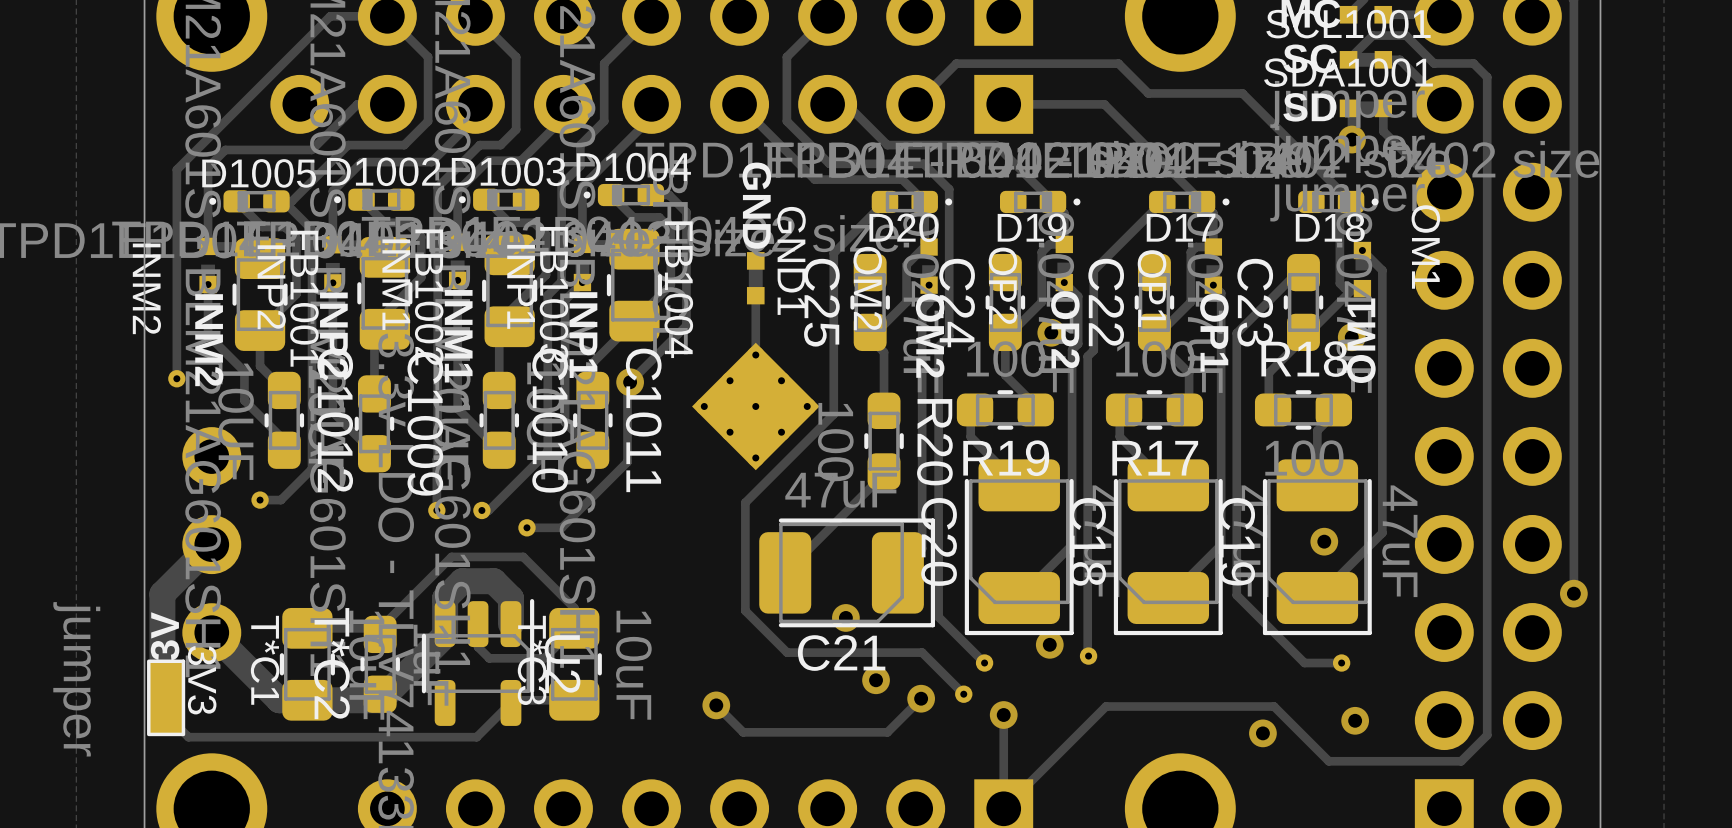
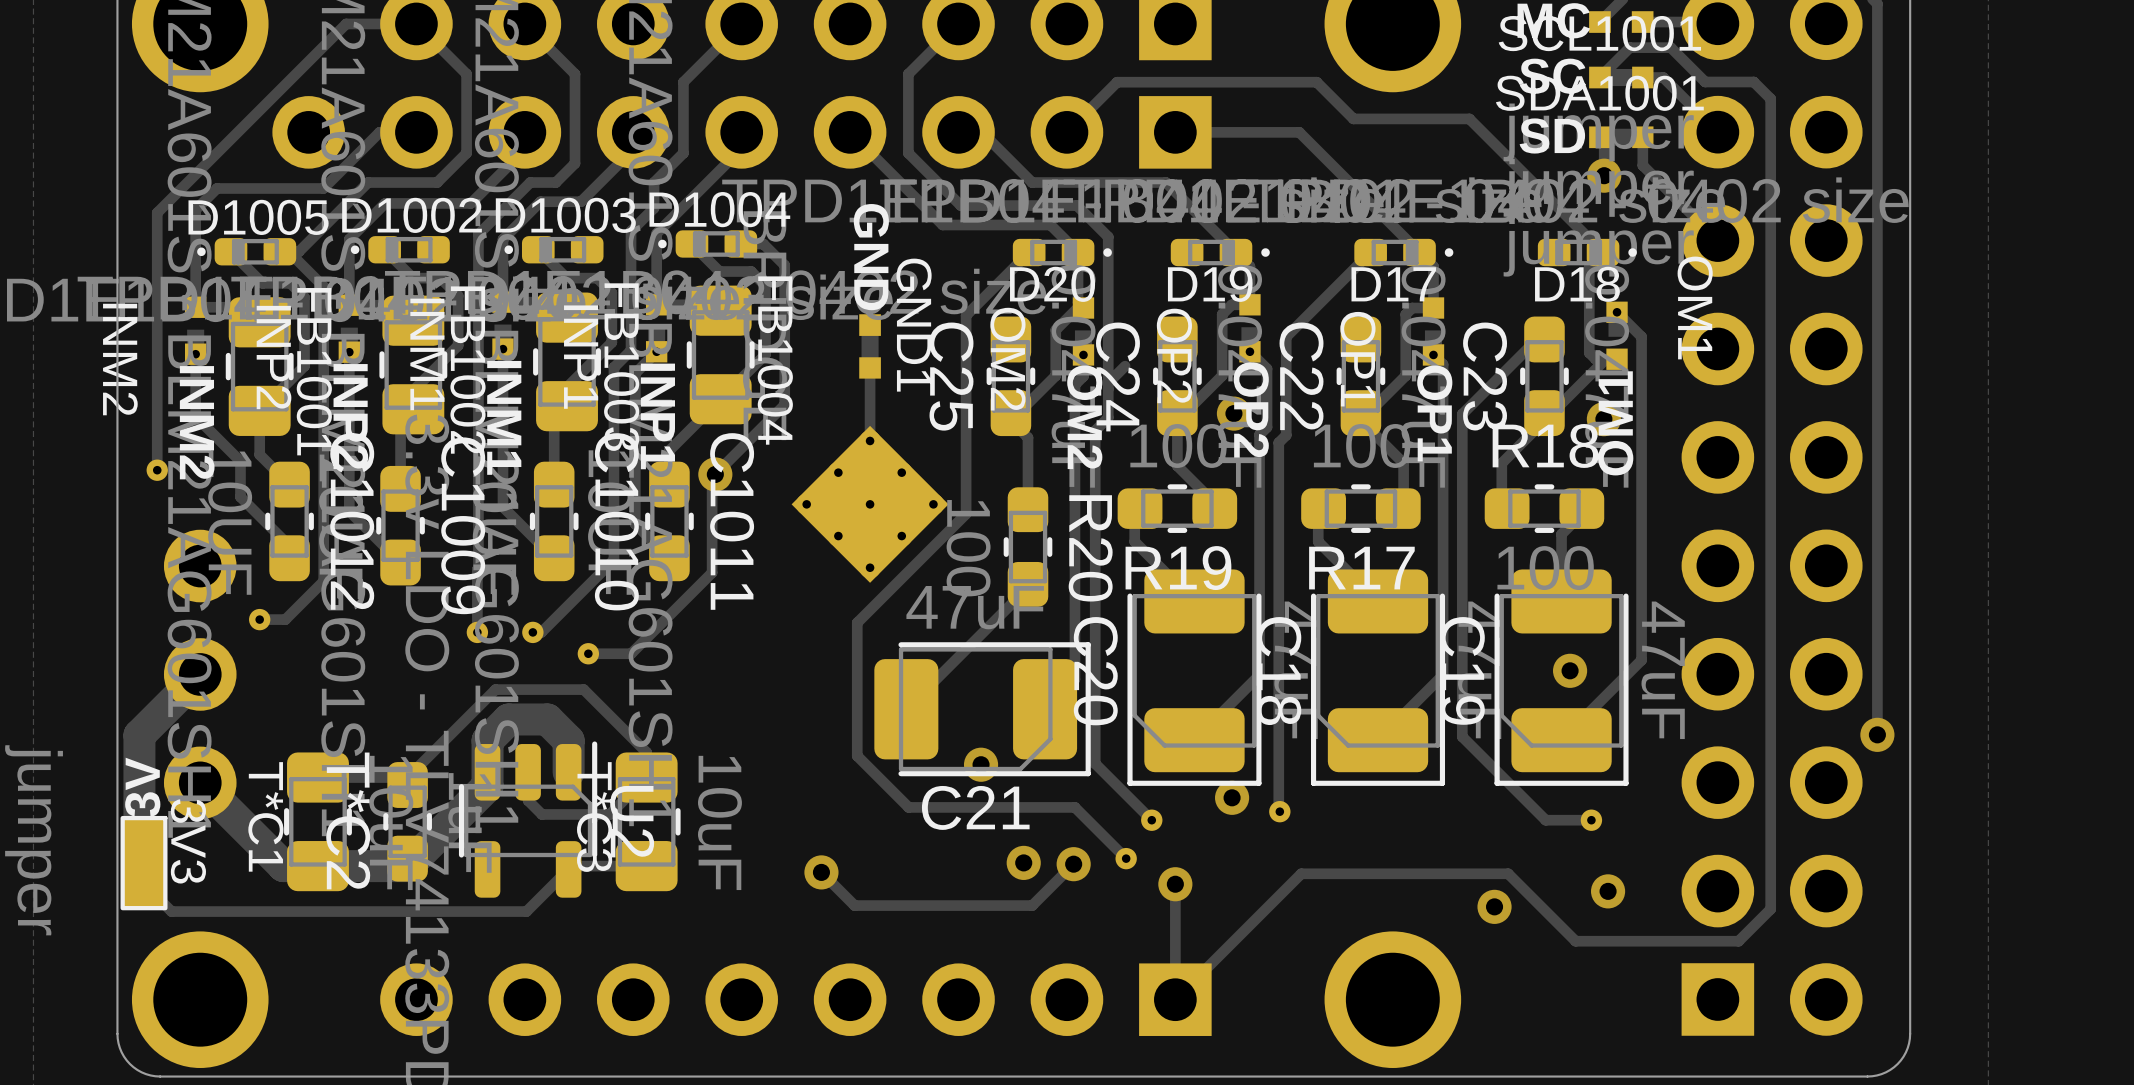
track: none -> (1125, 366) (1108, 383)
via position: (876, 680) -> (1023, 862)

